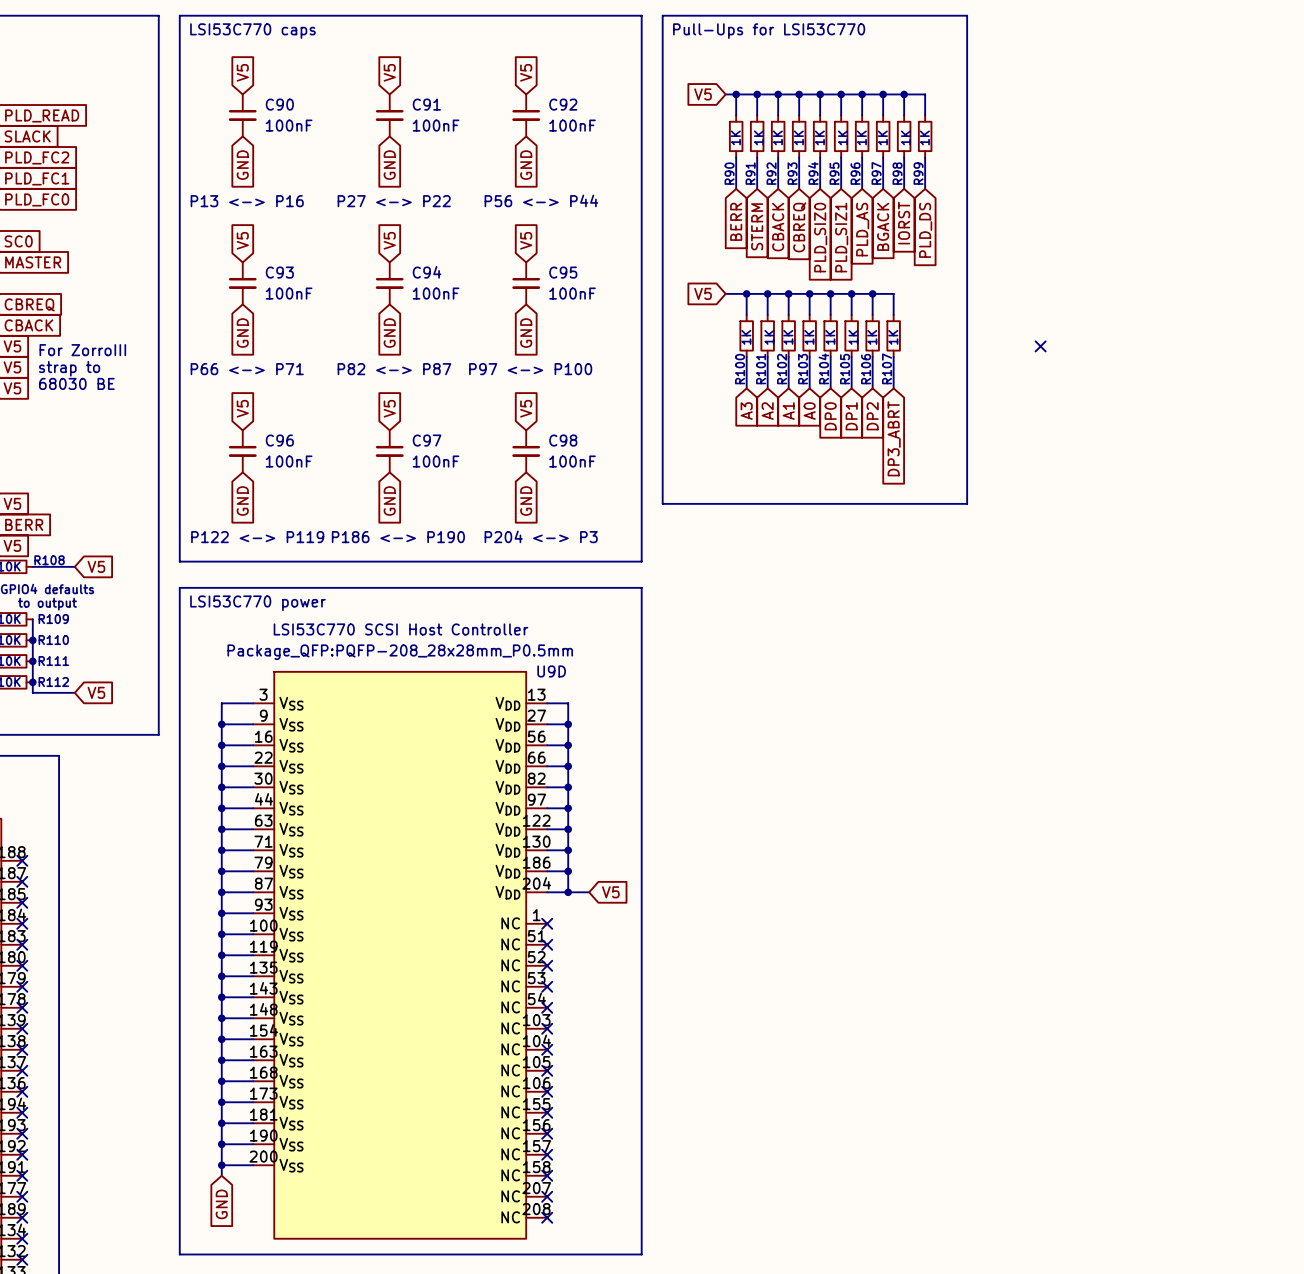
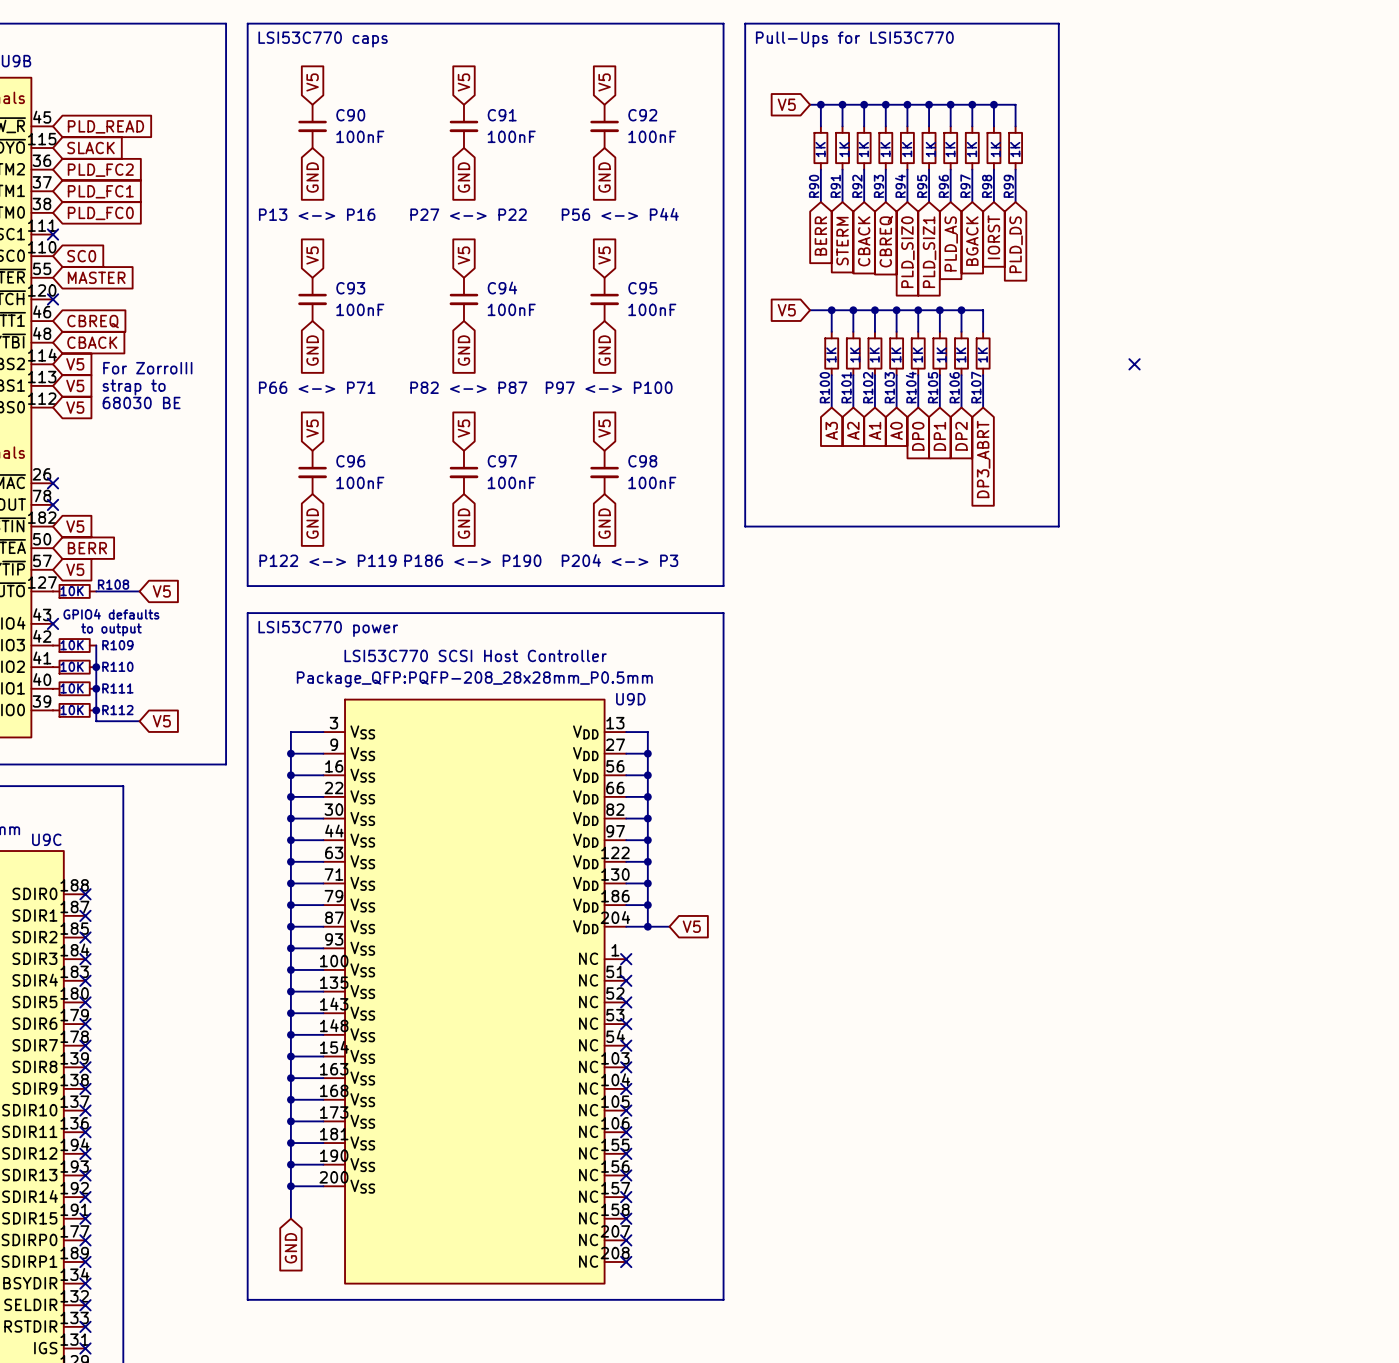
U9D symbol: [253, 671, 548, 1239] -> [323, 699, 627, 1284]
wire: (221, 1165) (253, 1165) -> none
junction: (221, 1165) -> none

